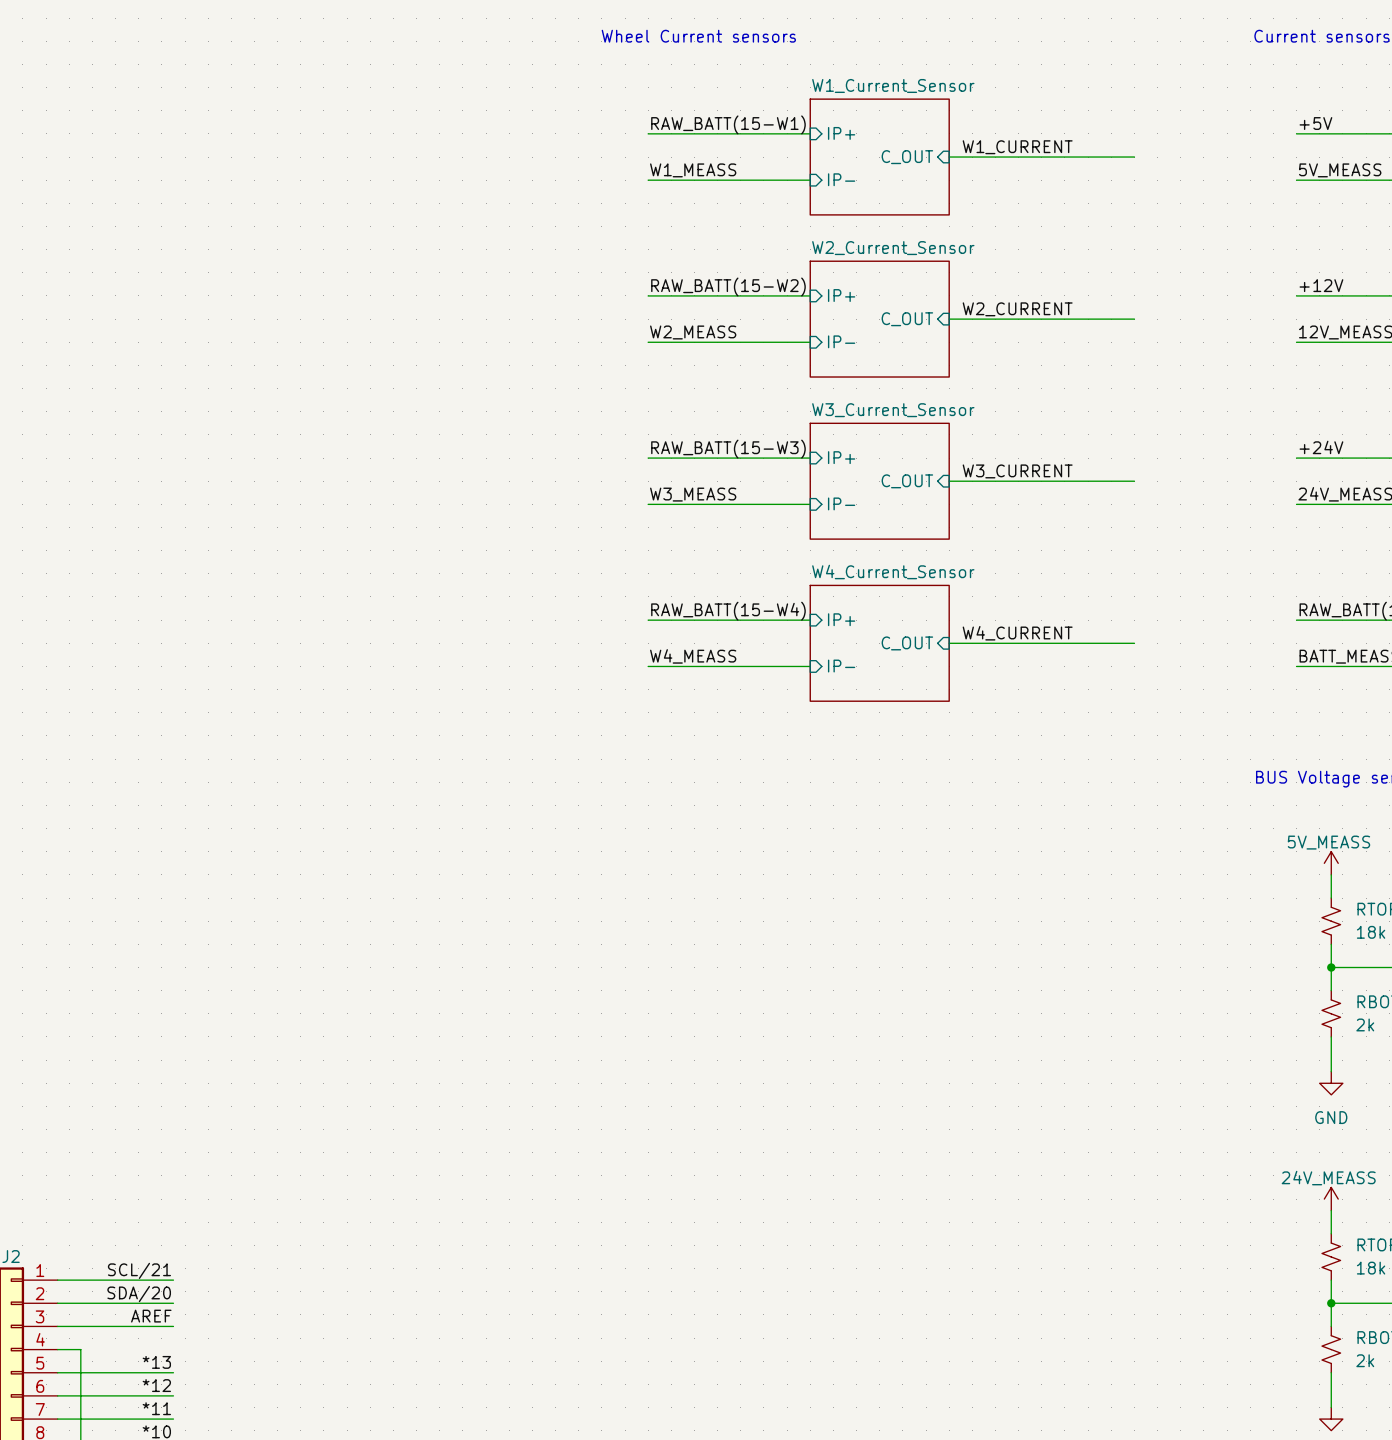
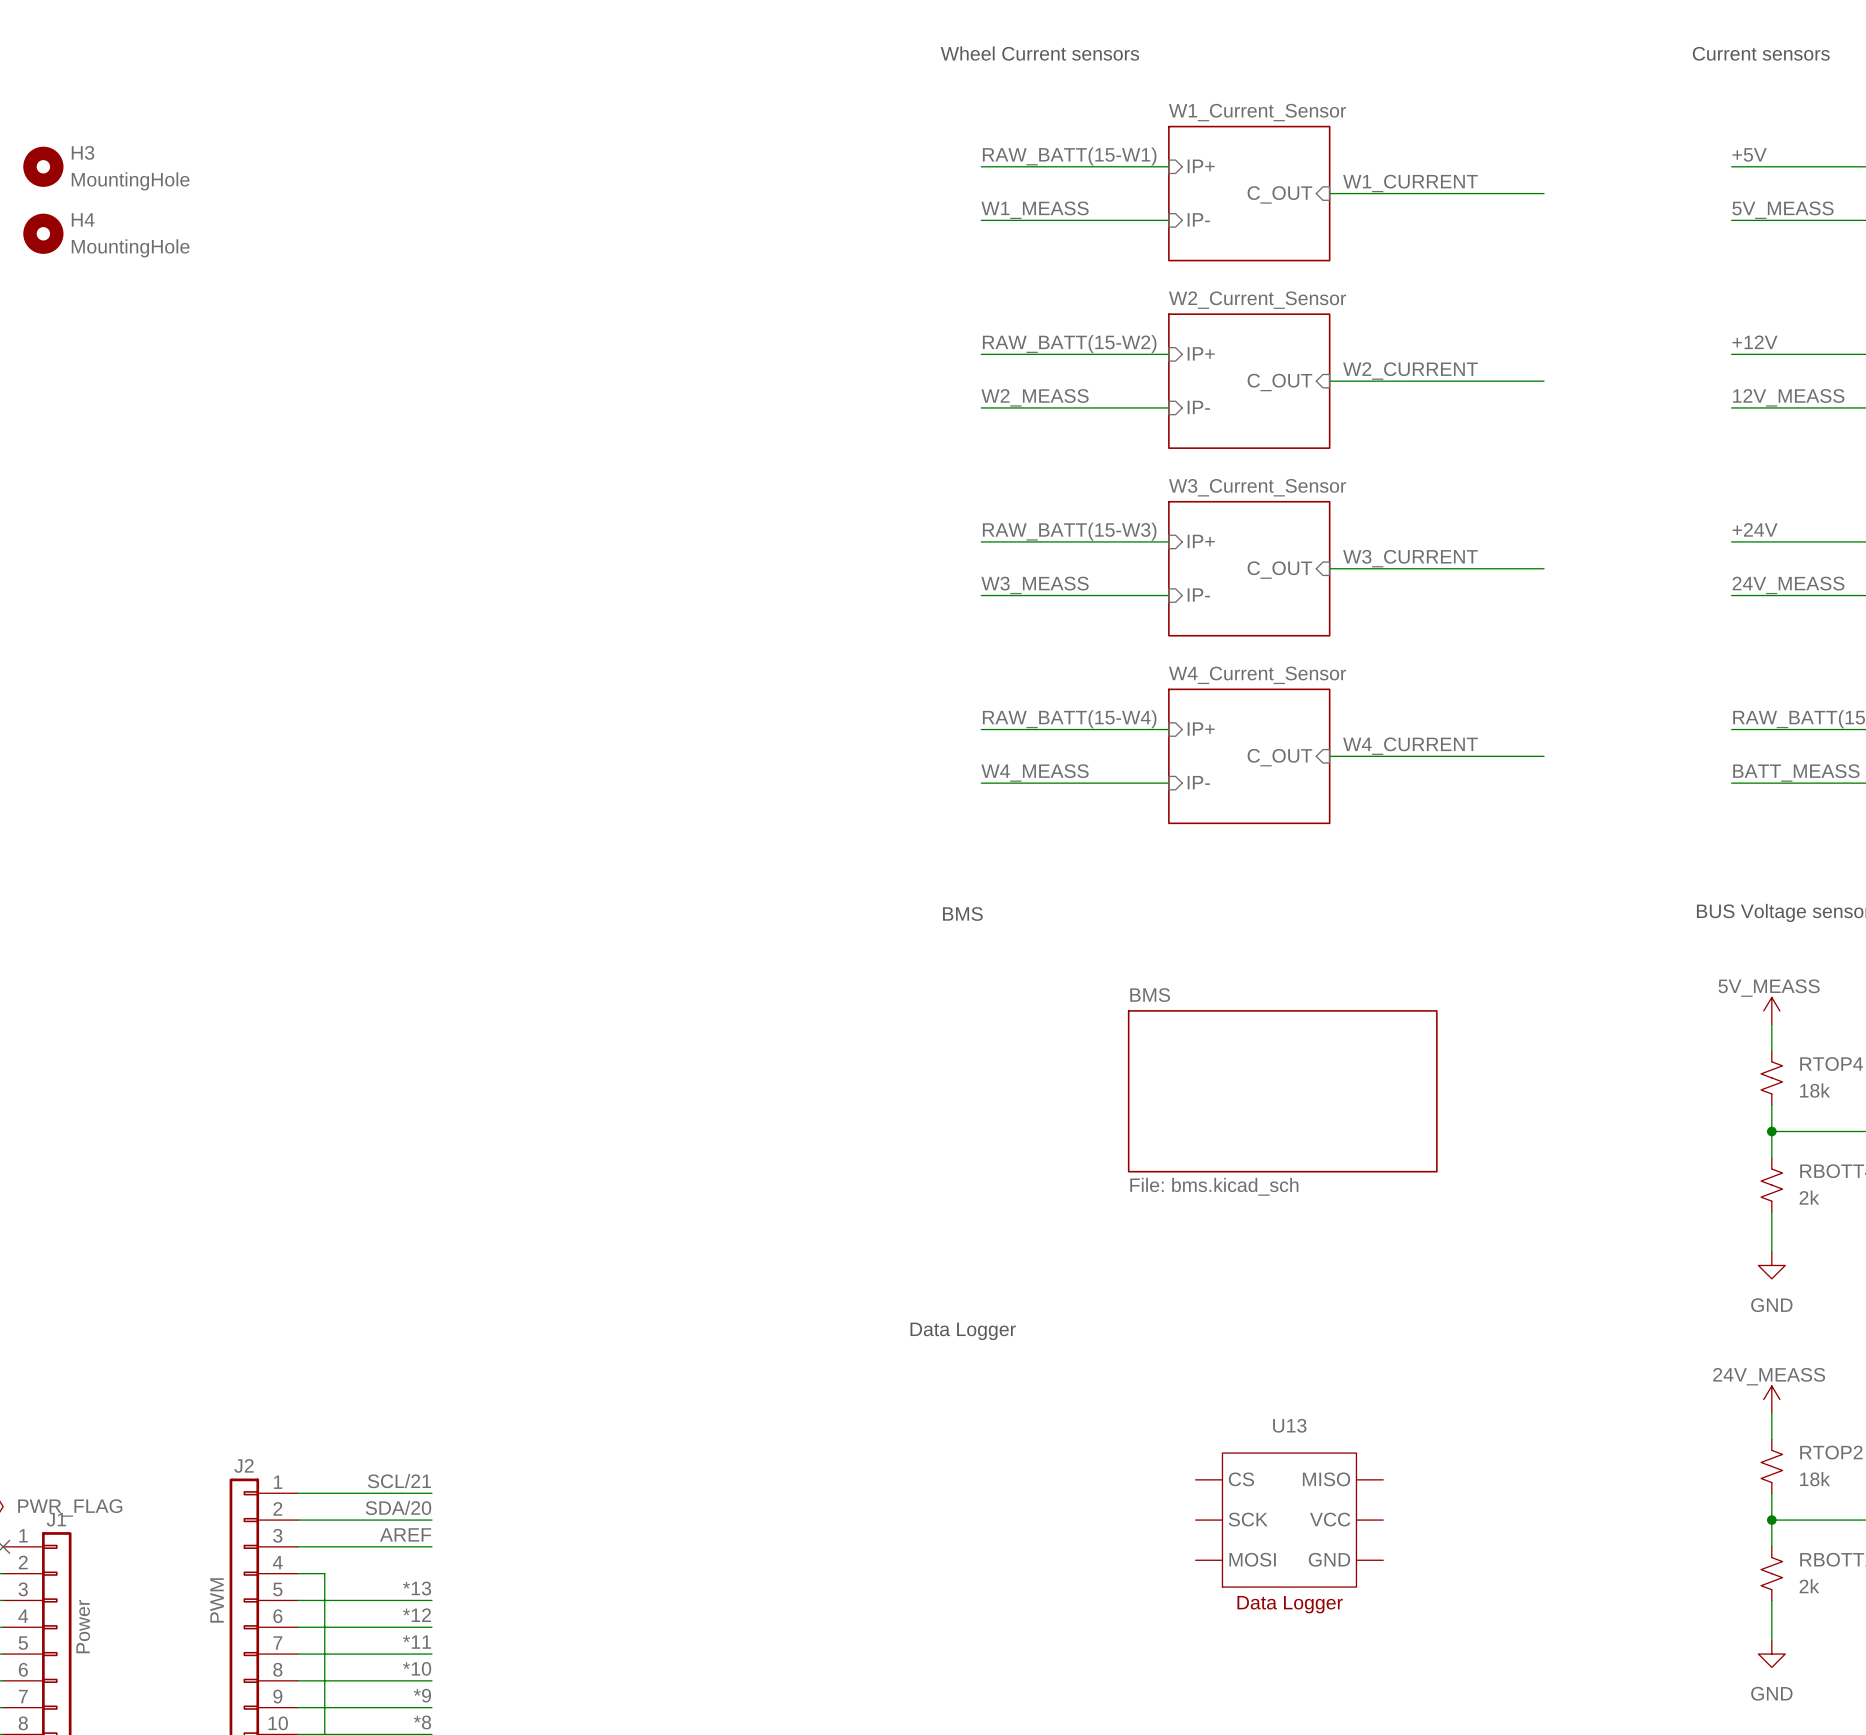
text: none -> BMS (962, 913)
sheet BMS: none -> File: bms.kicad_sch (1282, 1091)
text: none -> Data Logger (963, 1331)
U13: none -> (1289, 1520)

